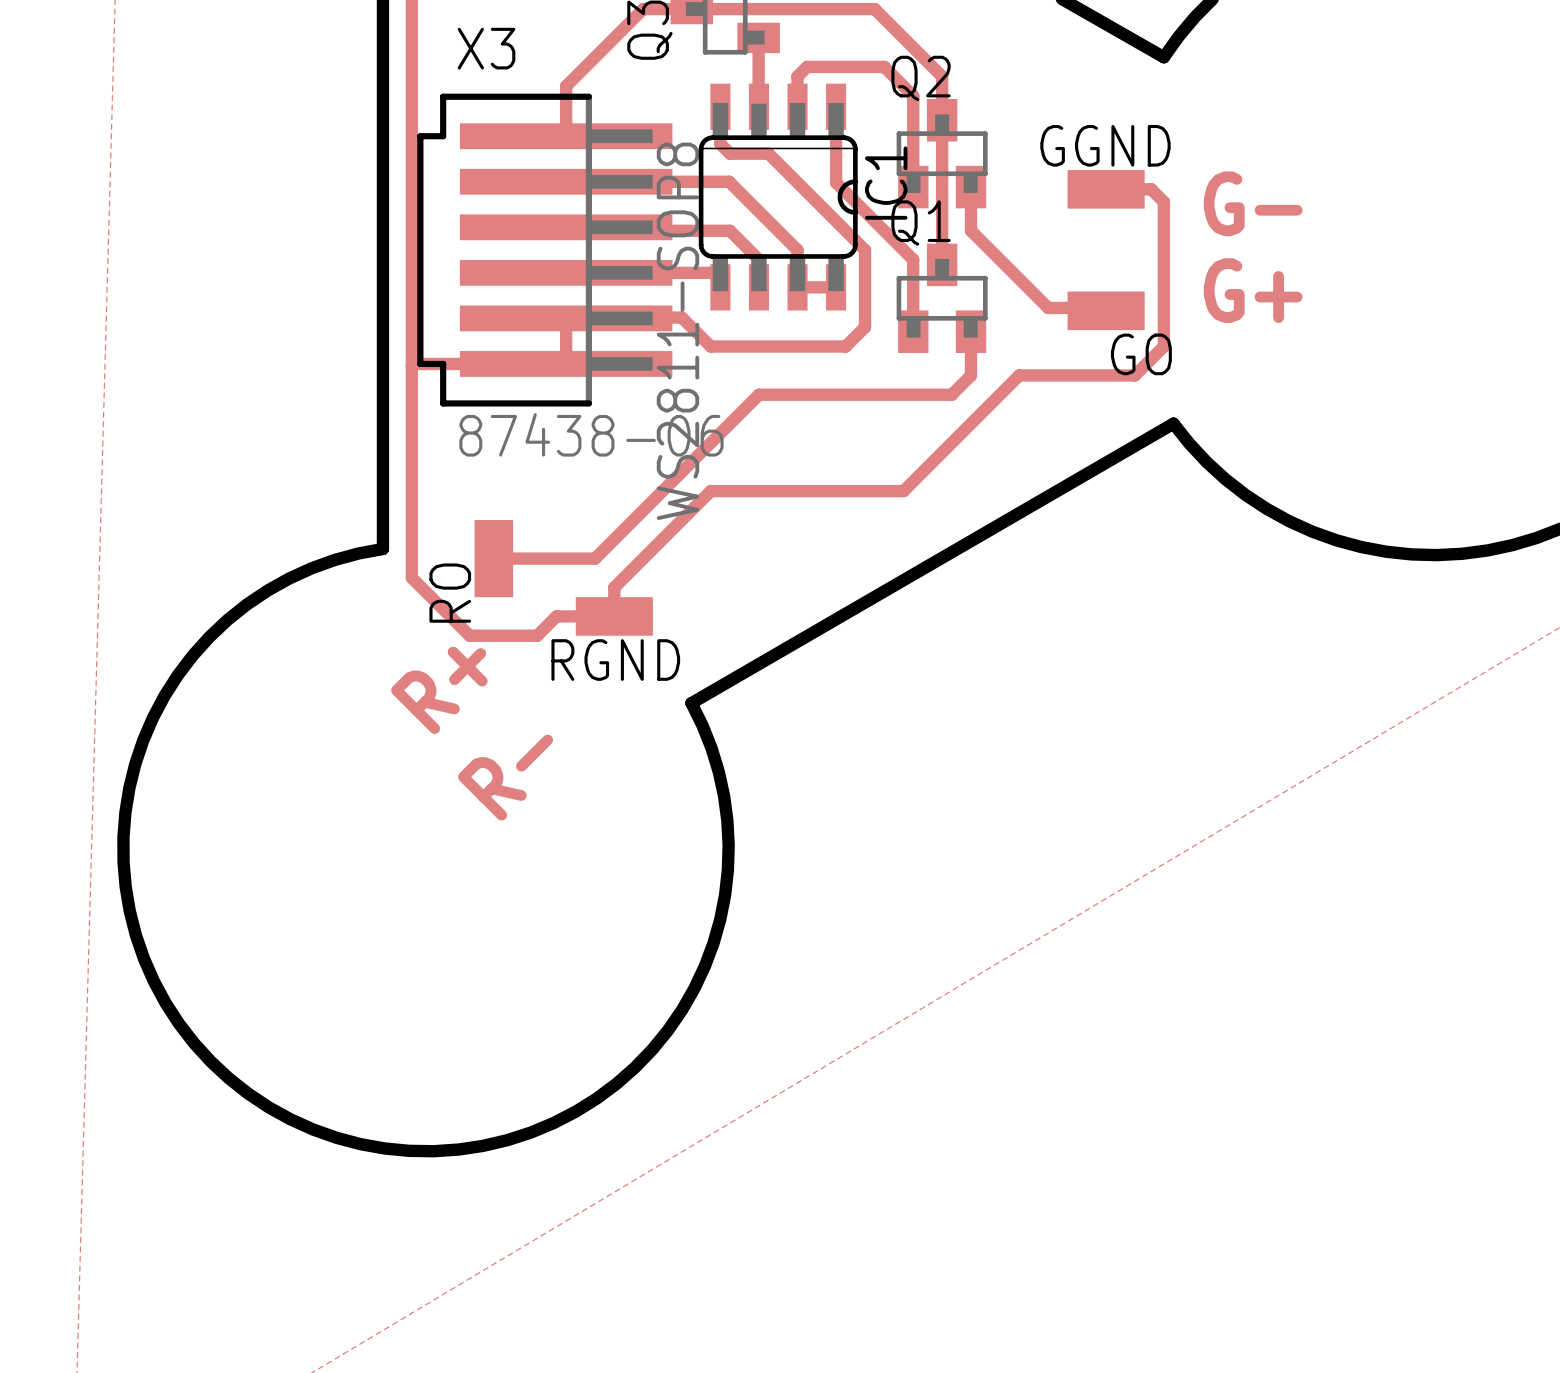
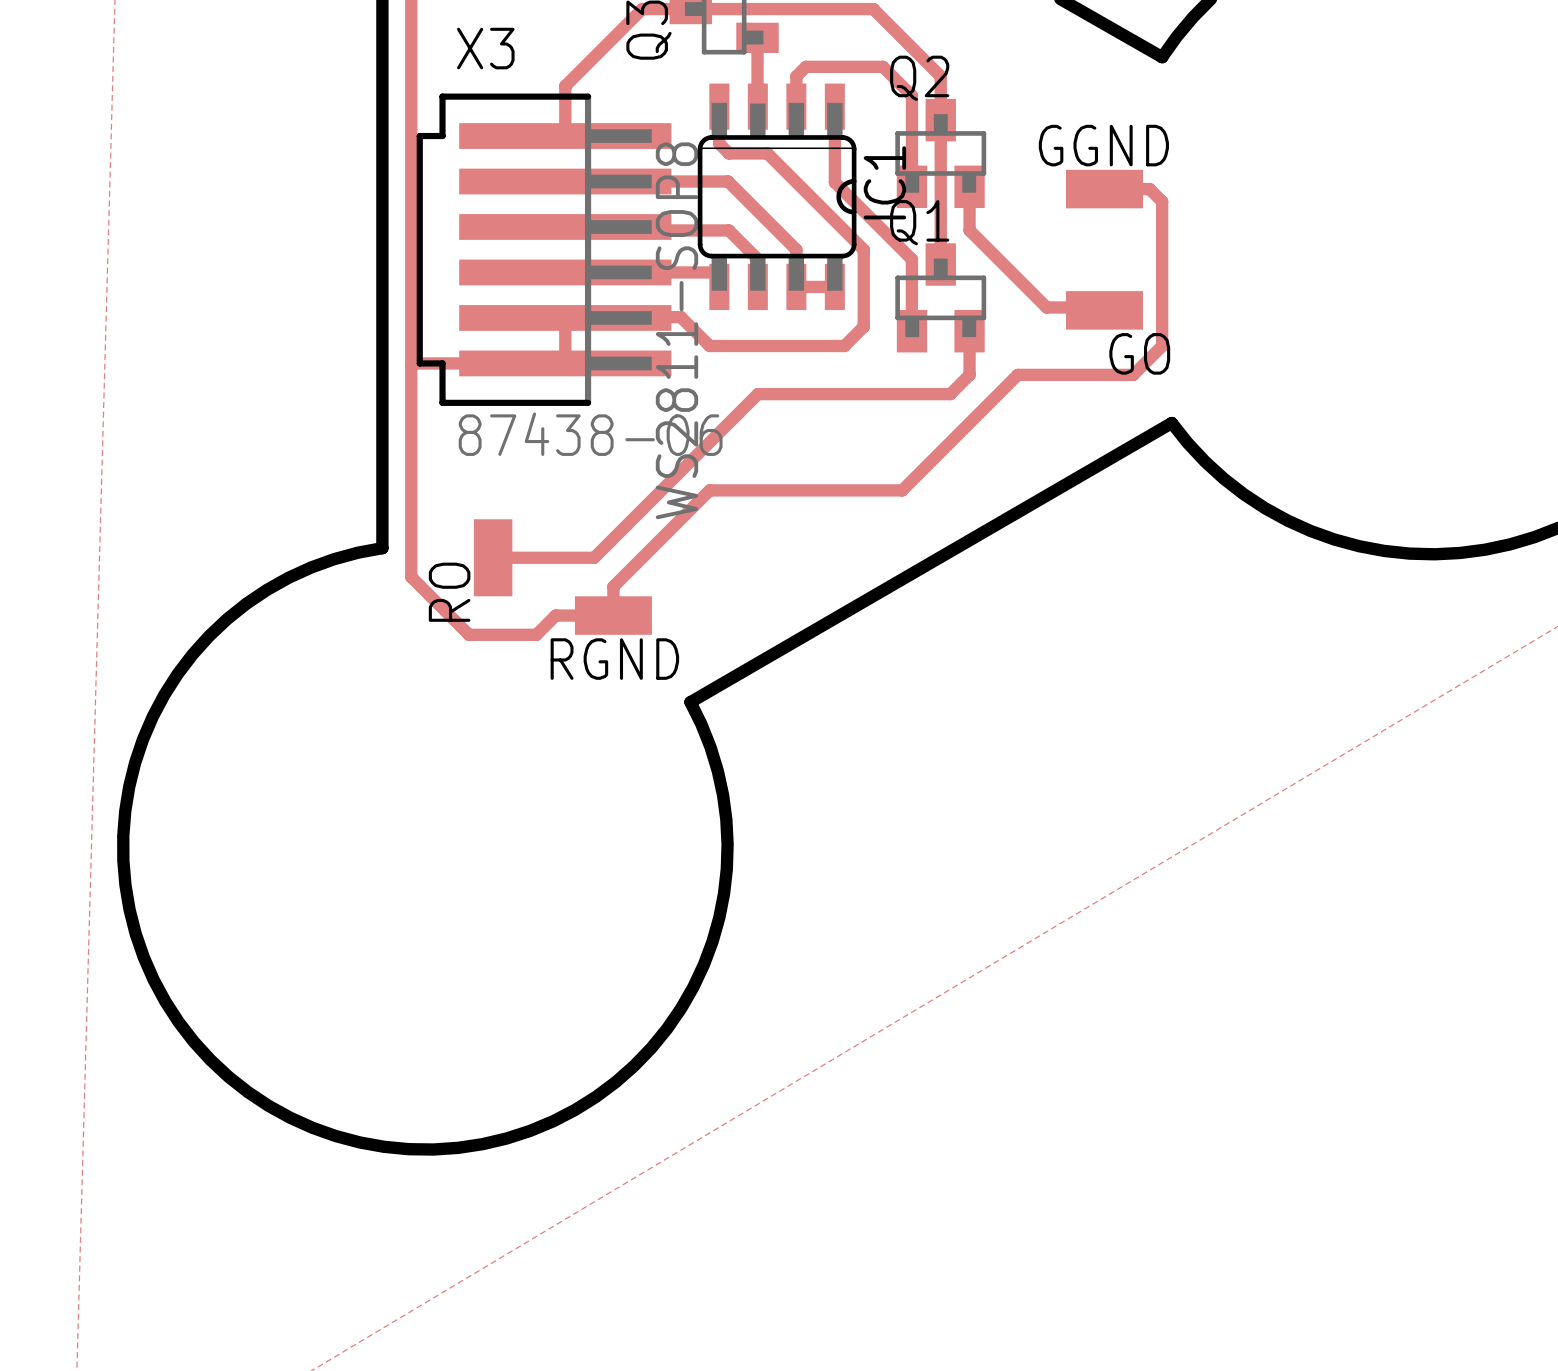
text: G- (1253, 203) -> none
text: G+ (1253, 290) -> none
text: R+ (439, 690) -> none
text: R- (505, 777) -> none

